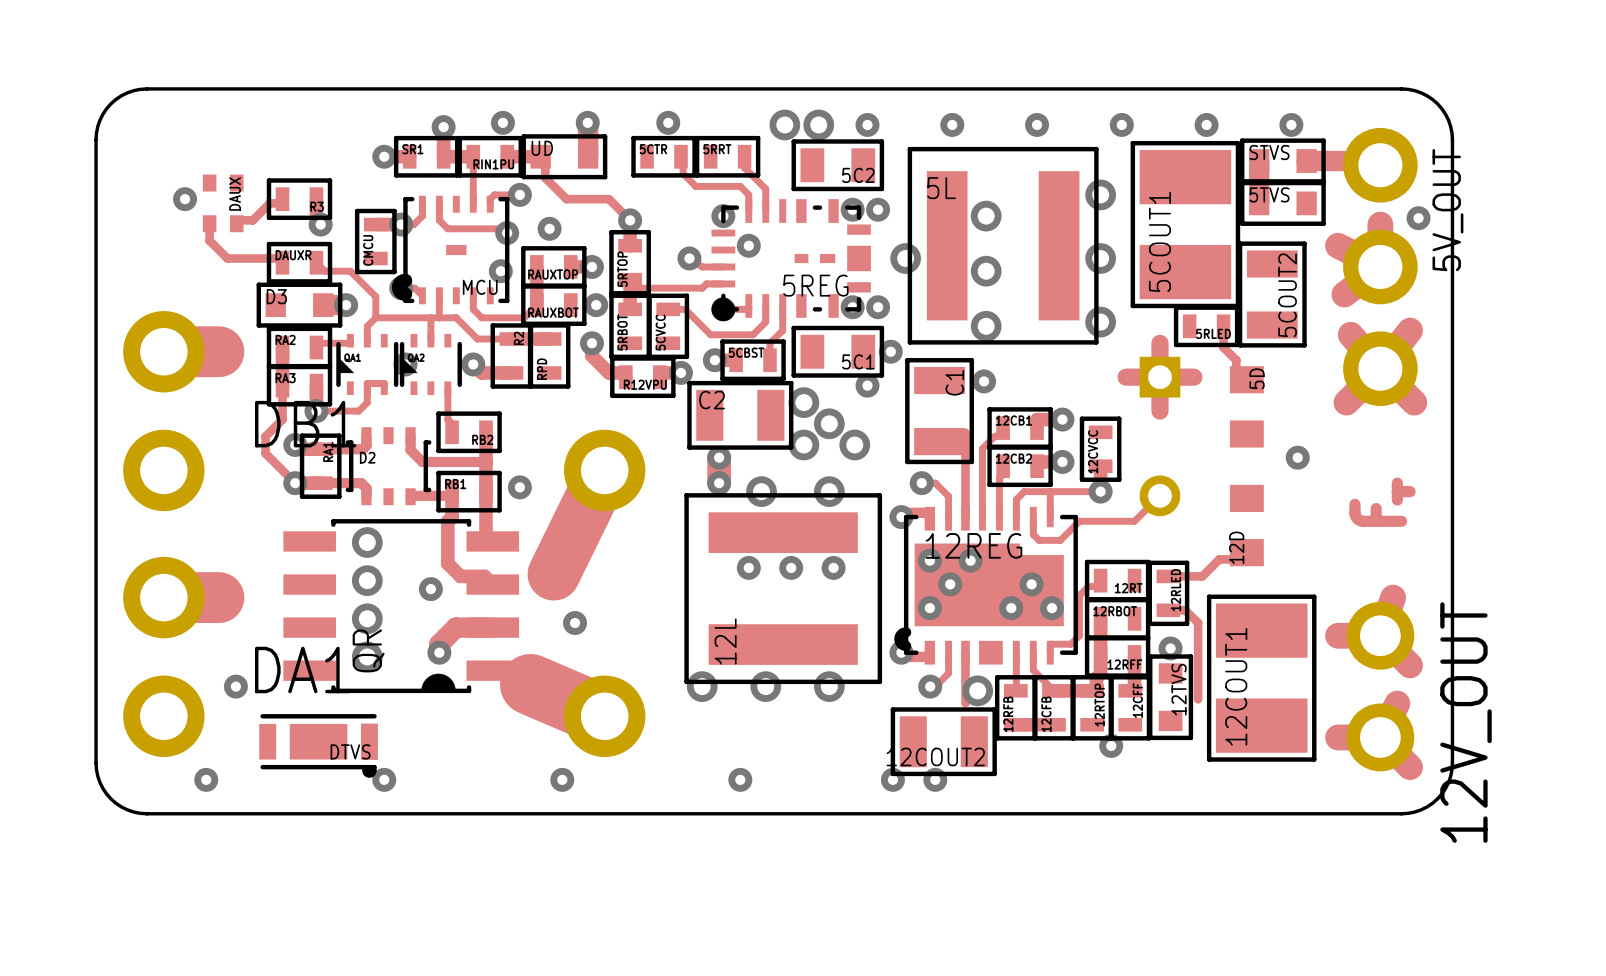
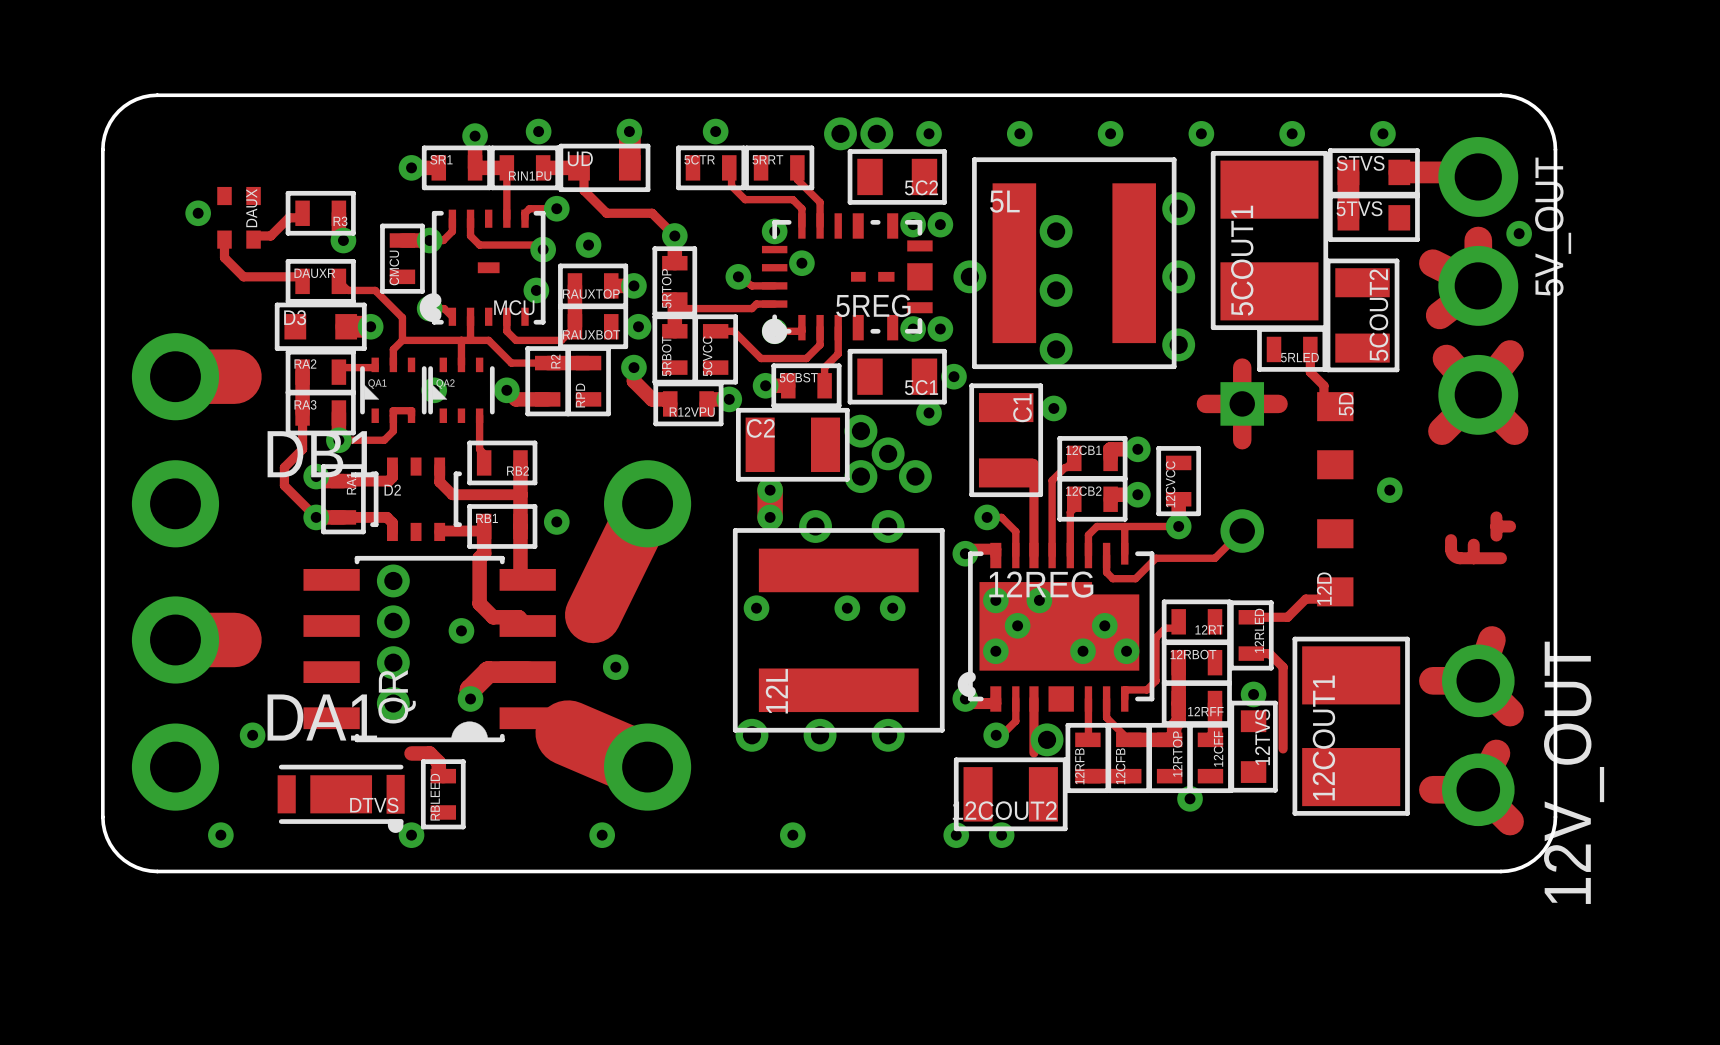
via position: (748, 567) -> (756, 608)
track: none -> (411, 753) (429, 753) (438, 762) (438, 771) (443, 776)
RBLEED: none -> (443, 794)

